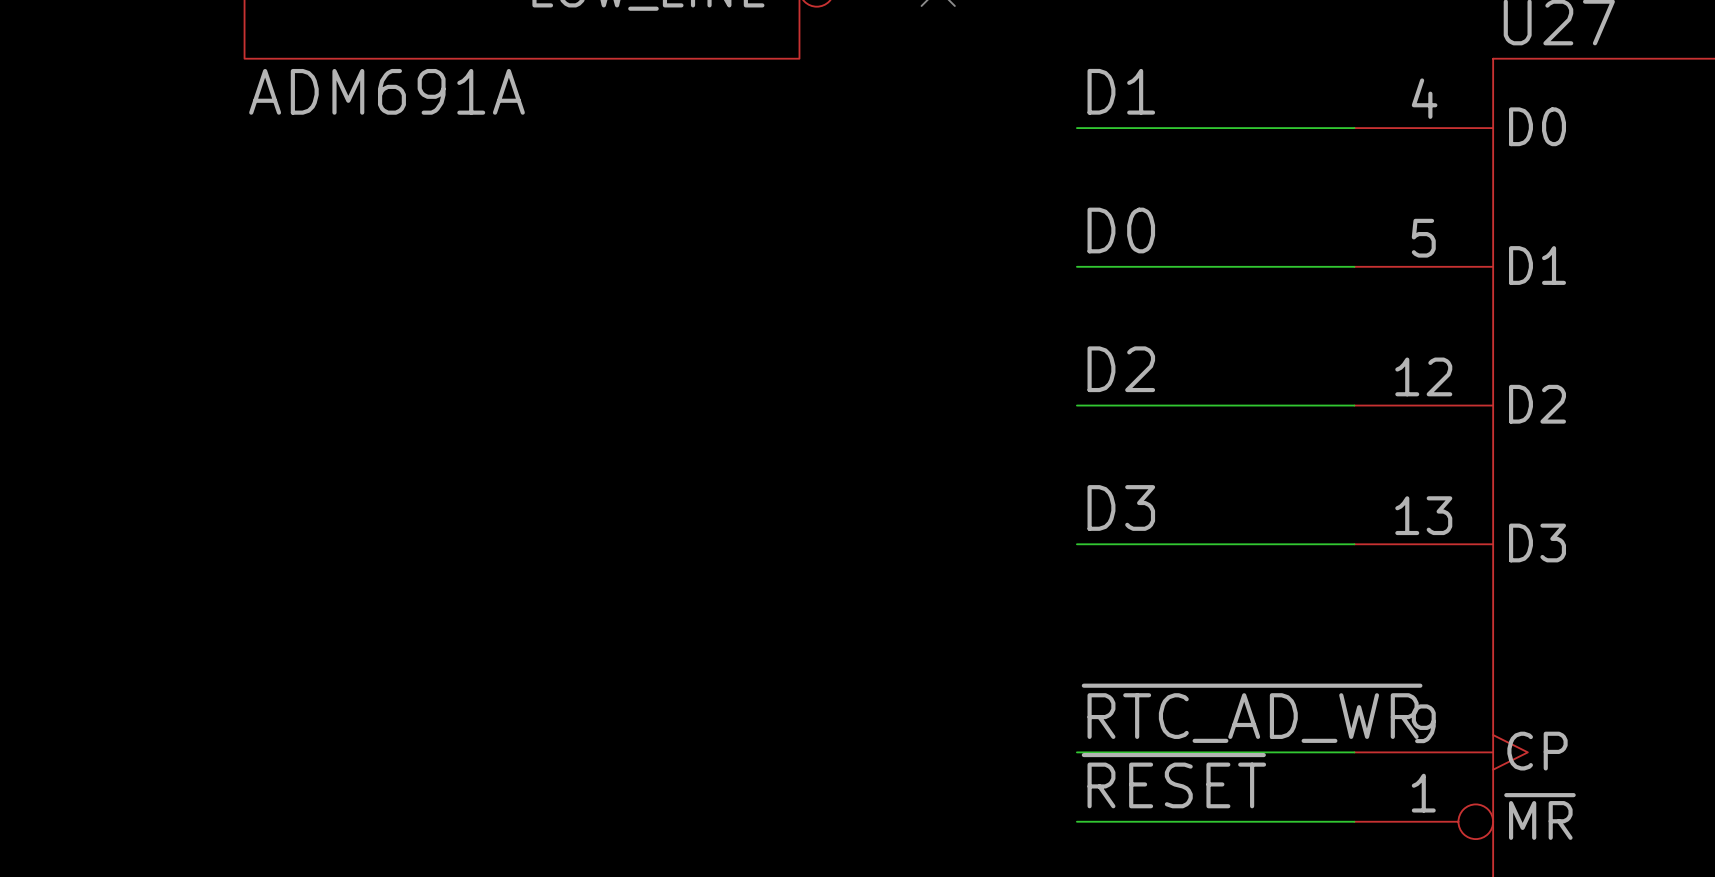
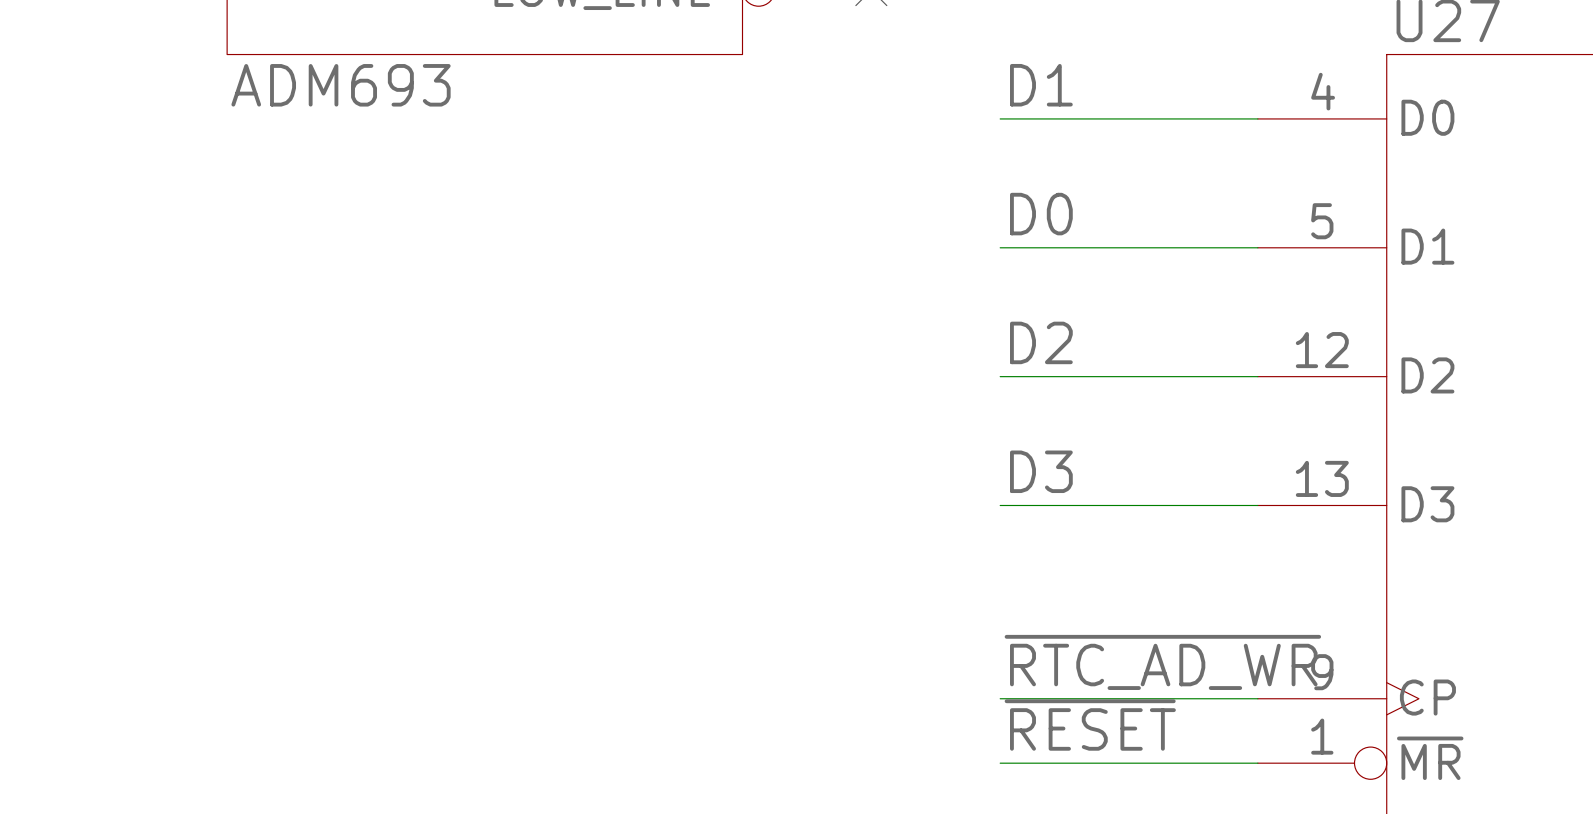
part value: ADM691A (387, 91) -> ADM693 (341, 85)

